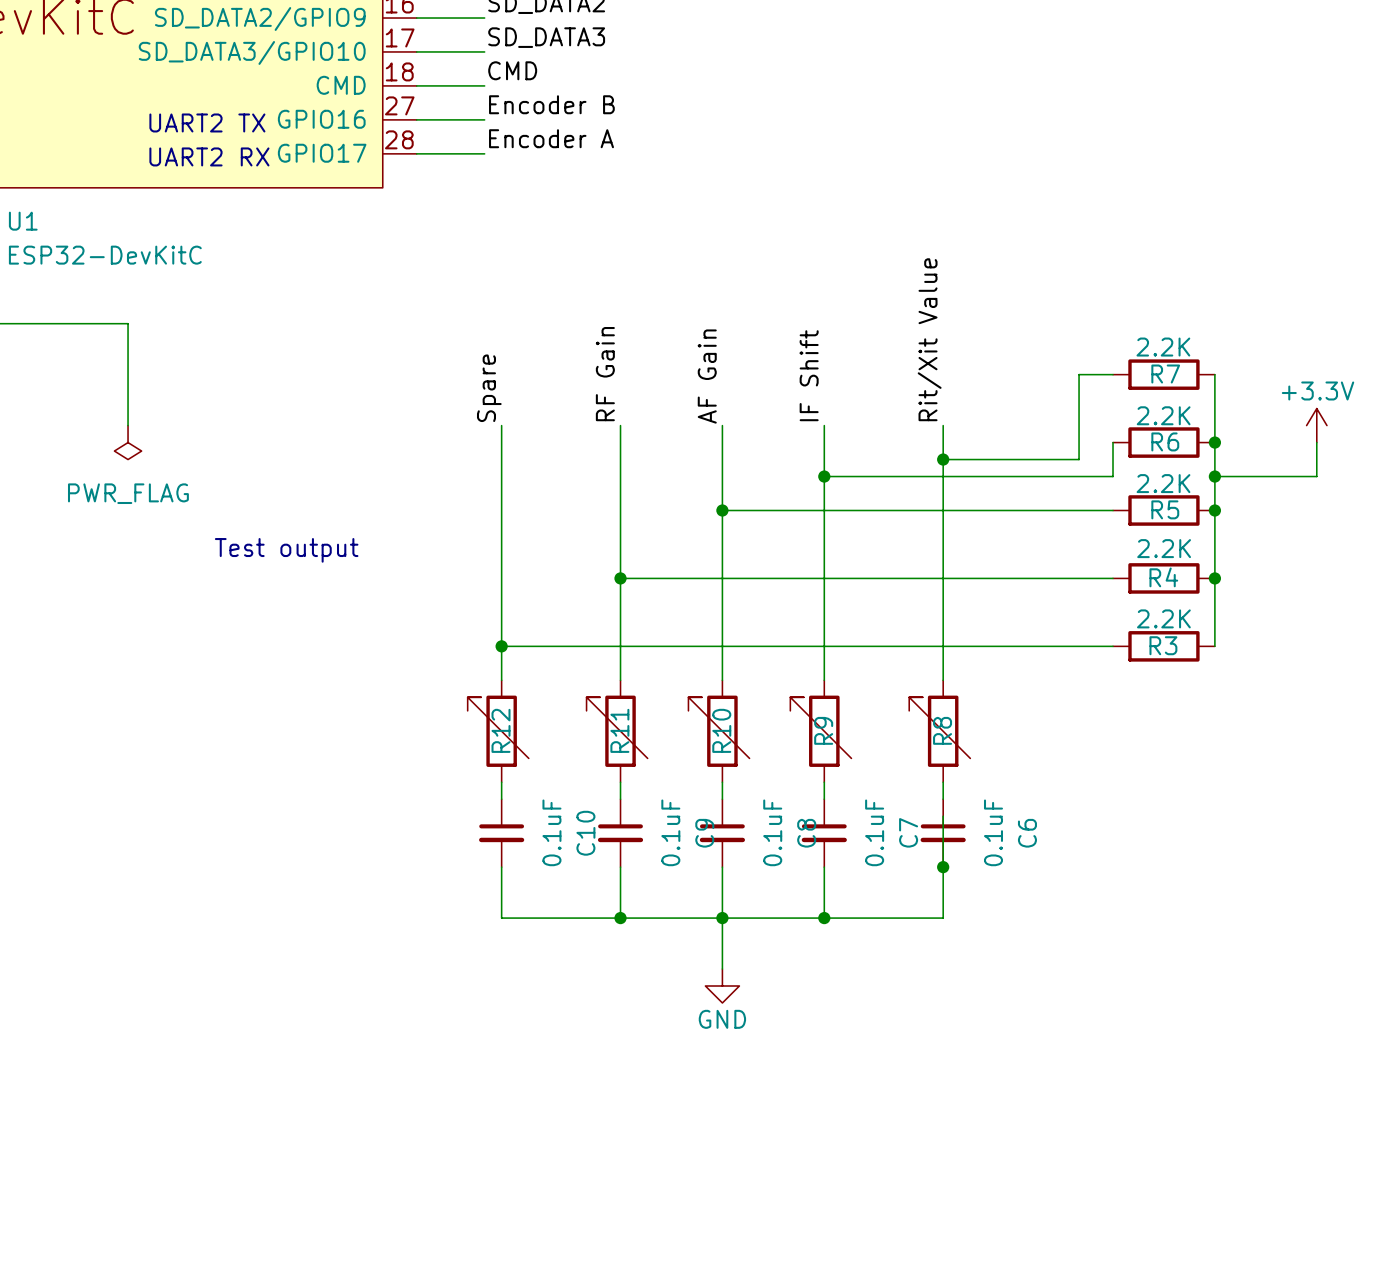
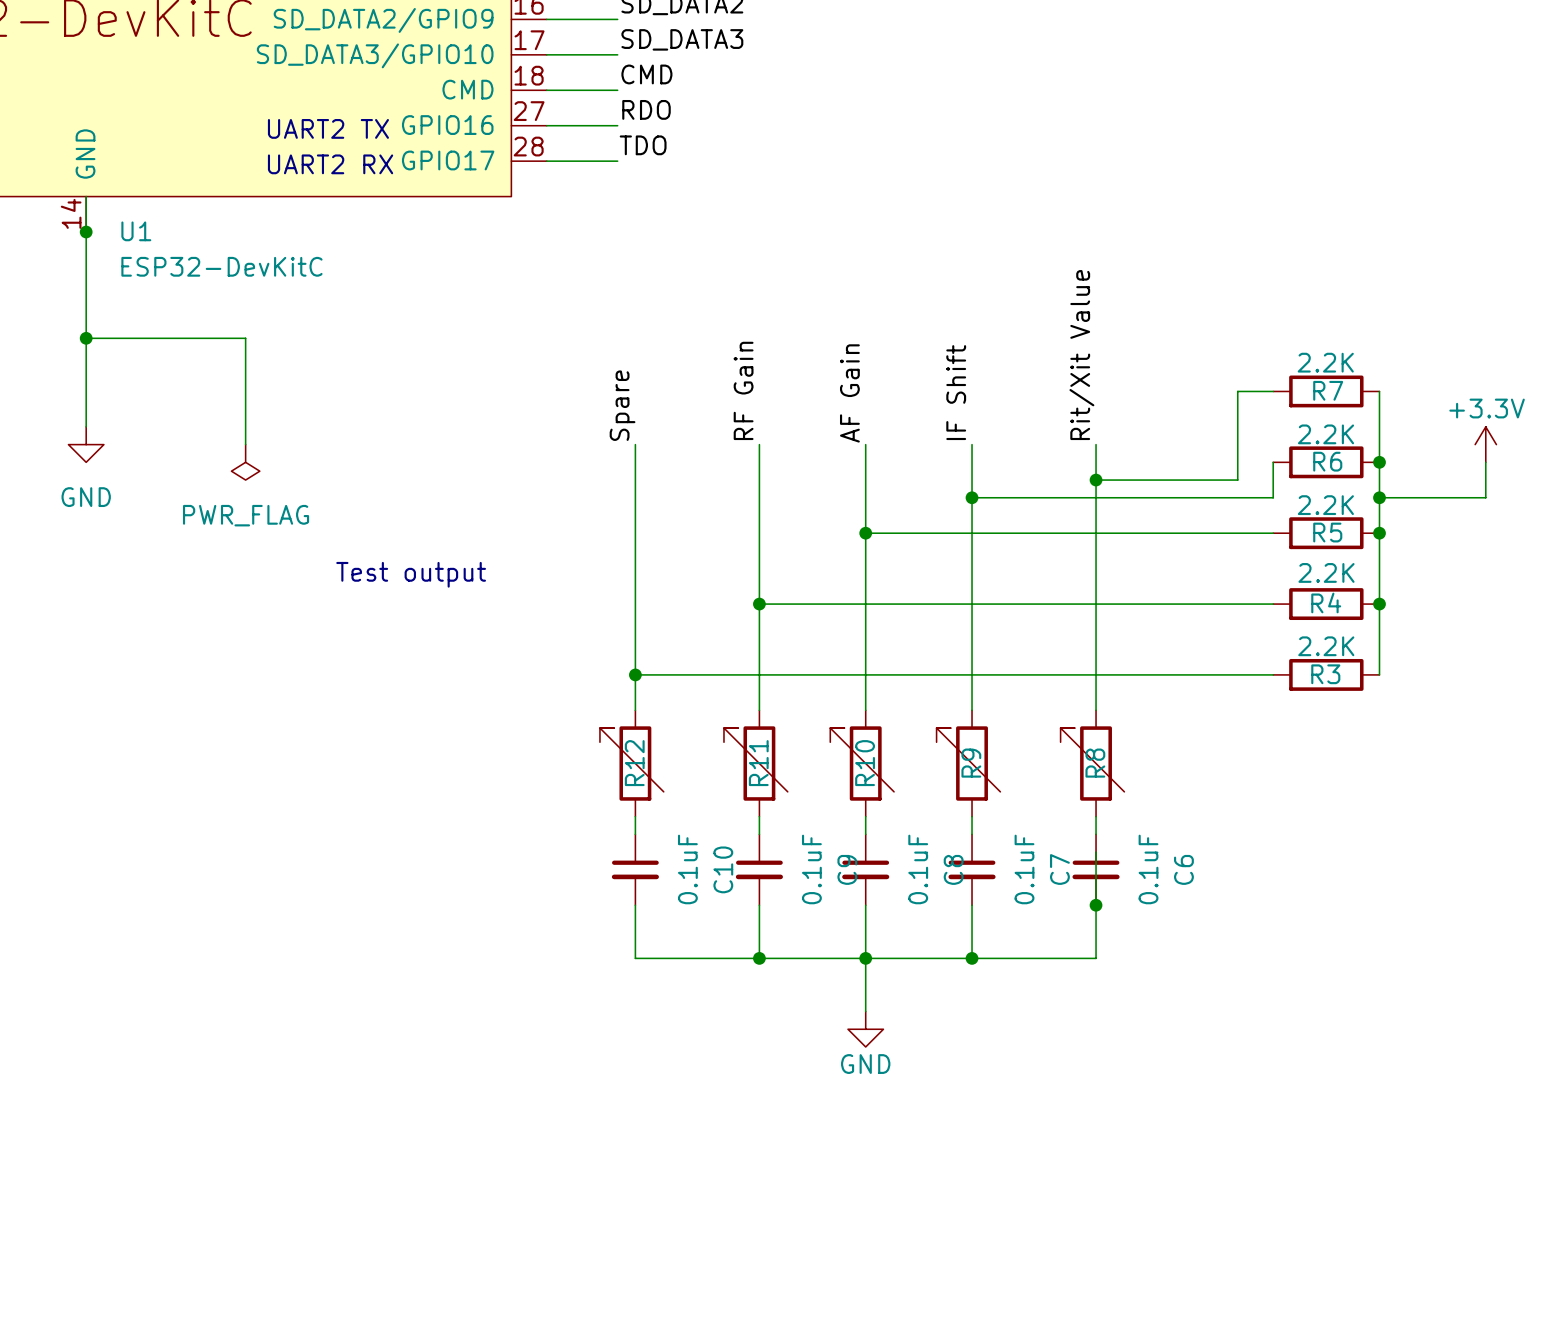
label: Encoder B (551, 104) -> RDO (646, 109)
label: Encoder A (551, 138) -> TDO (643, 145)

